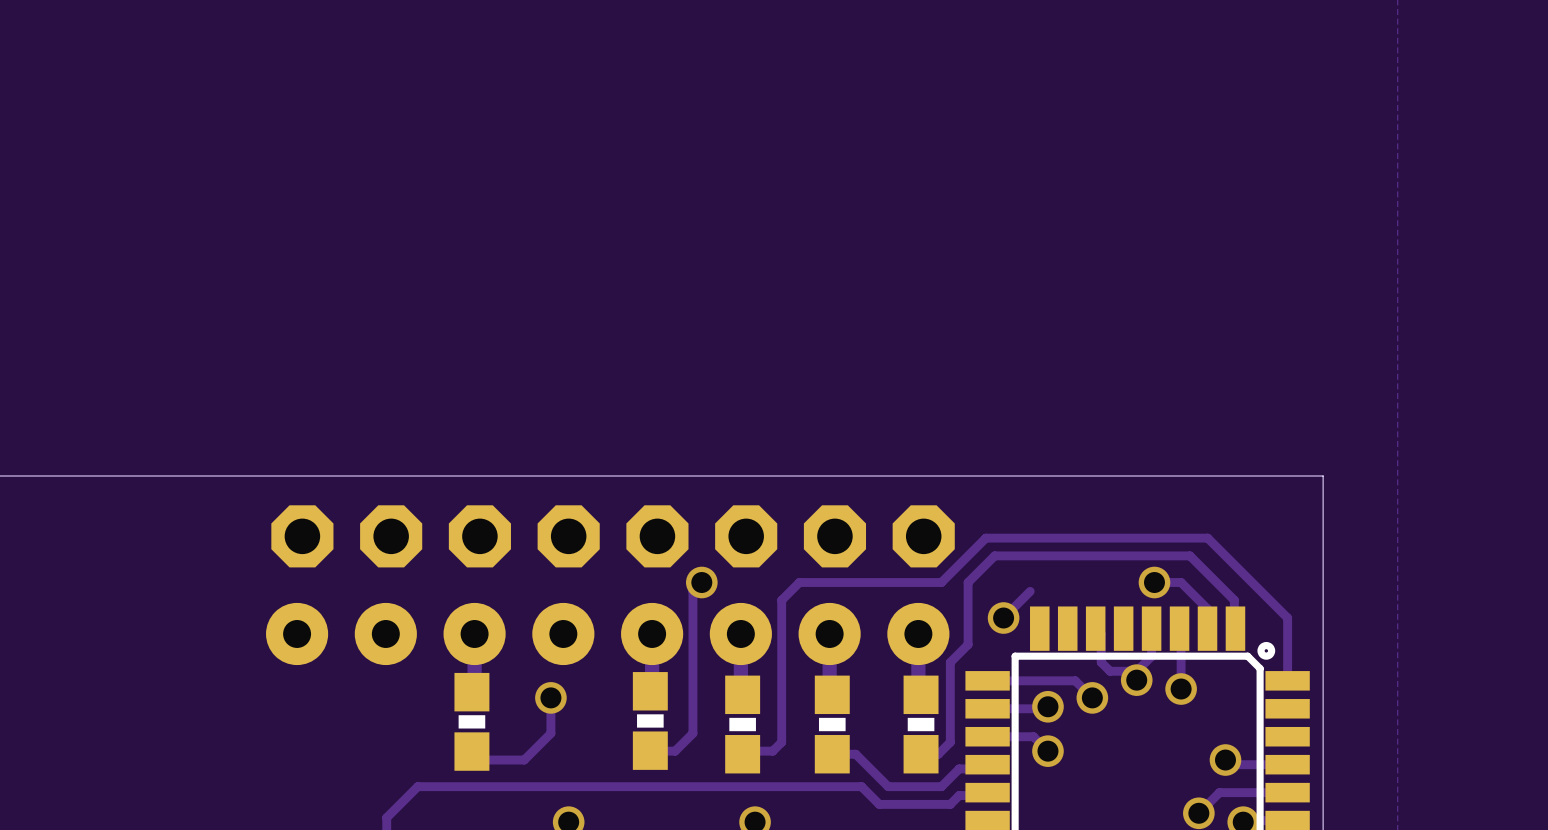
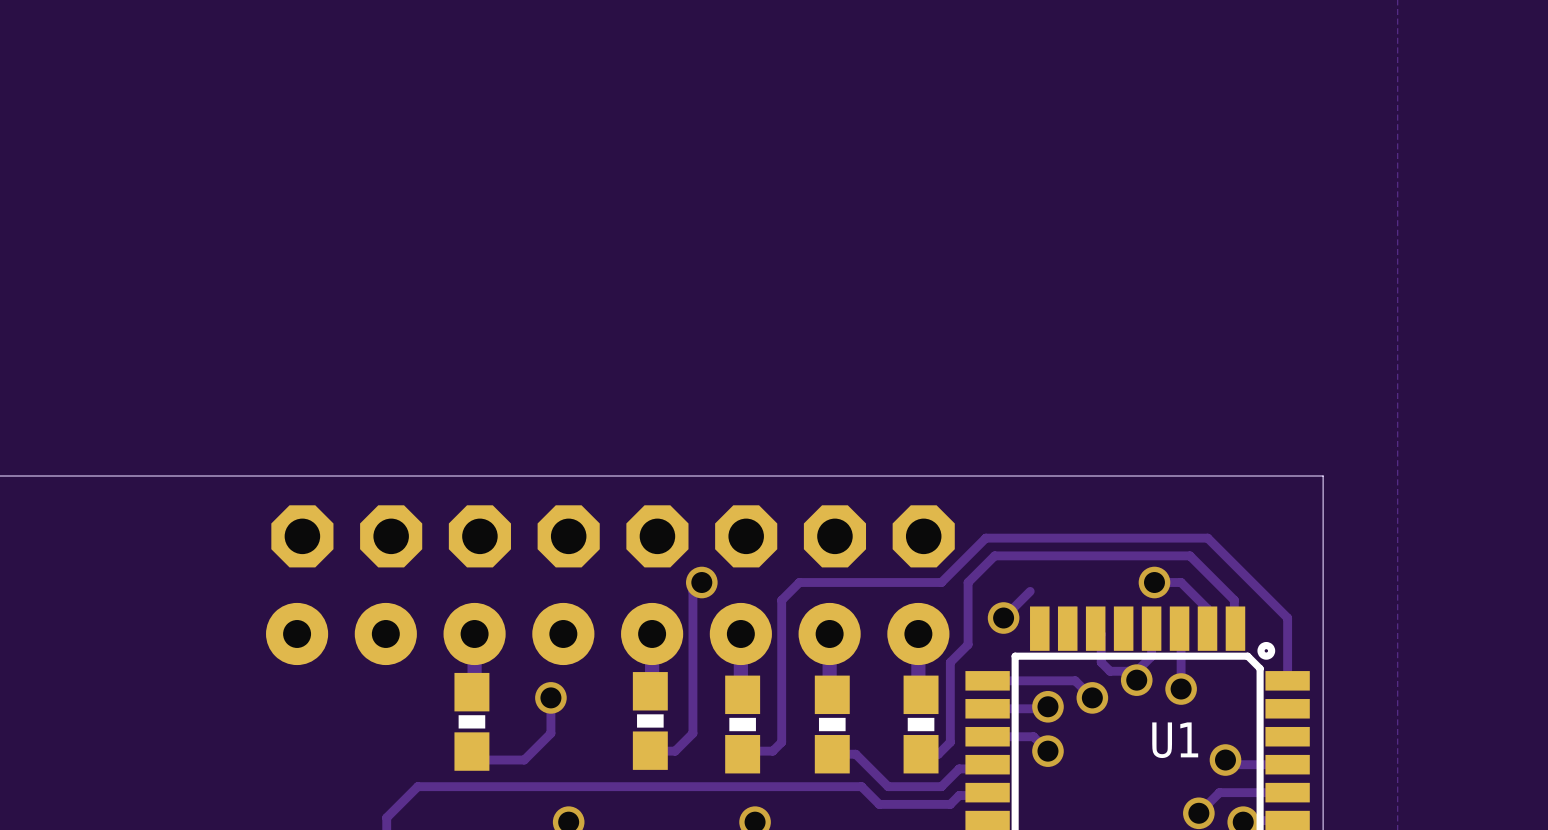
U1 name: none -> U1 (1175, 740)

